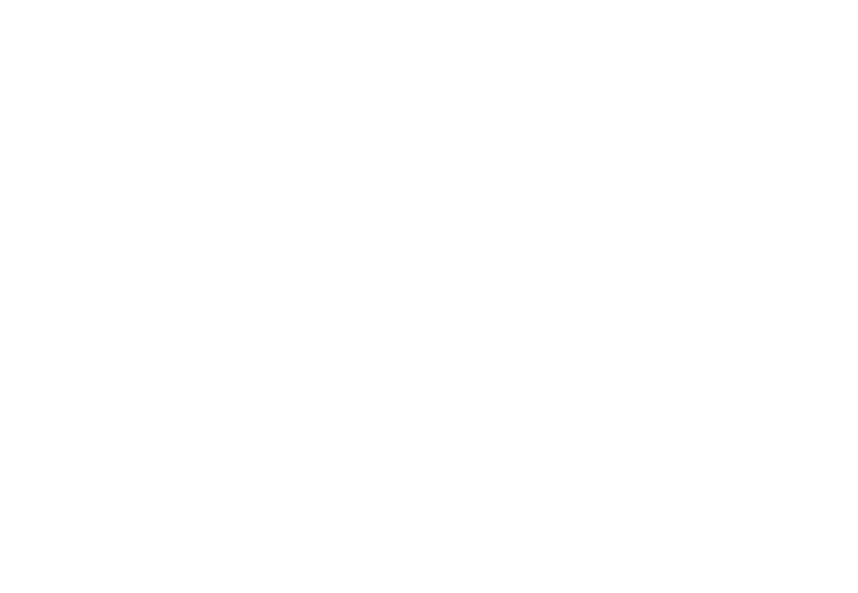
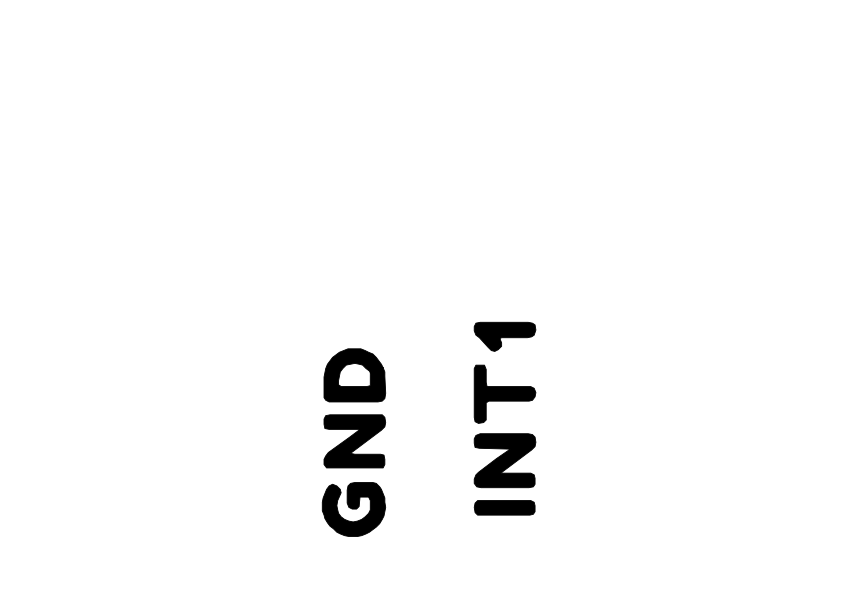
drawing: none -> [321, 321, 537, 537]

